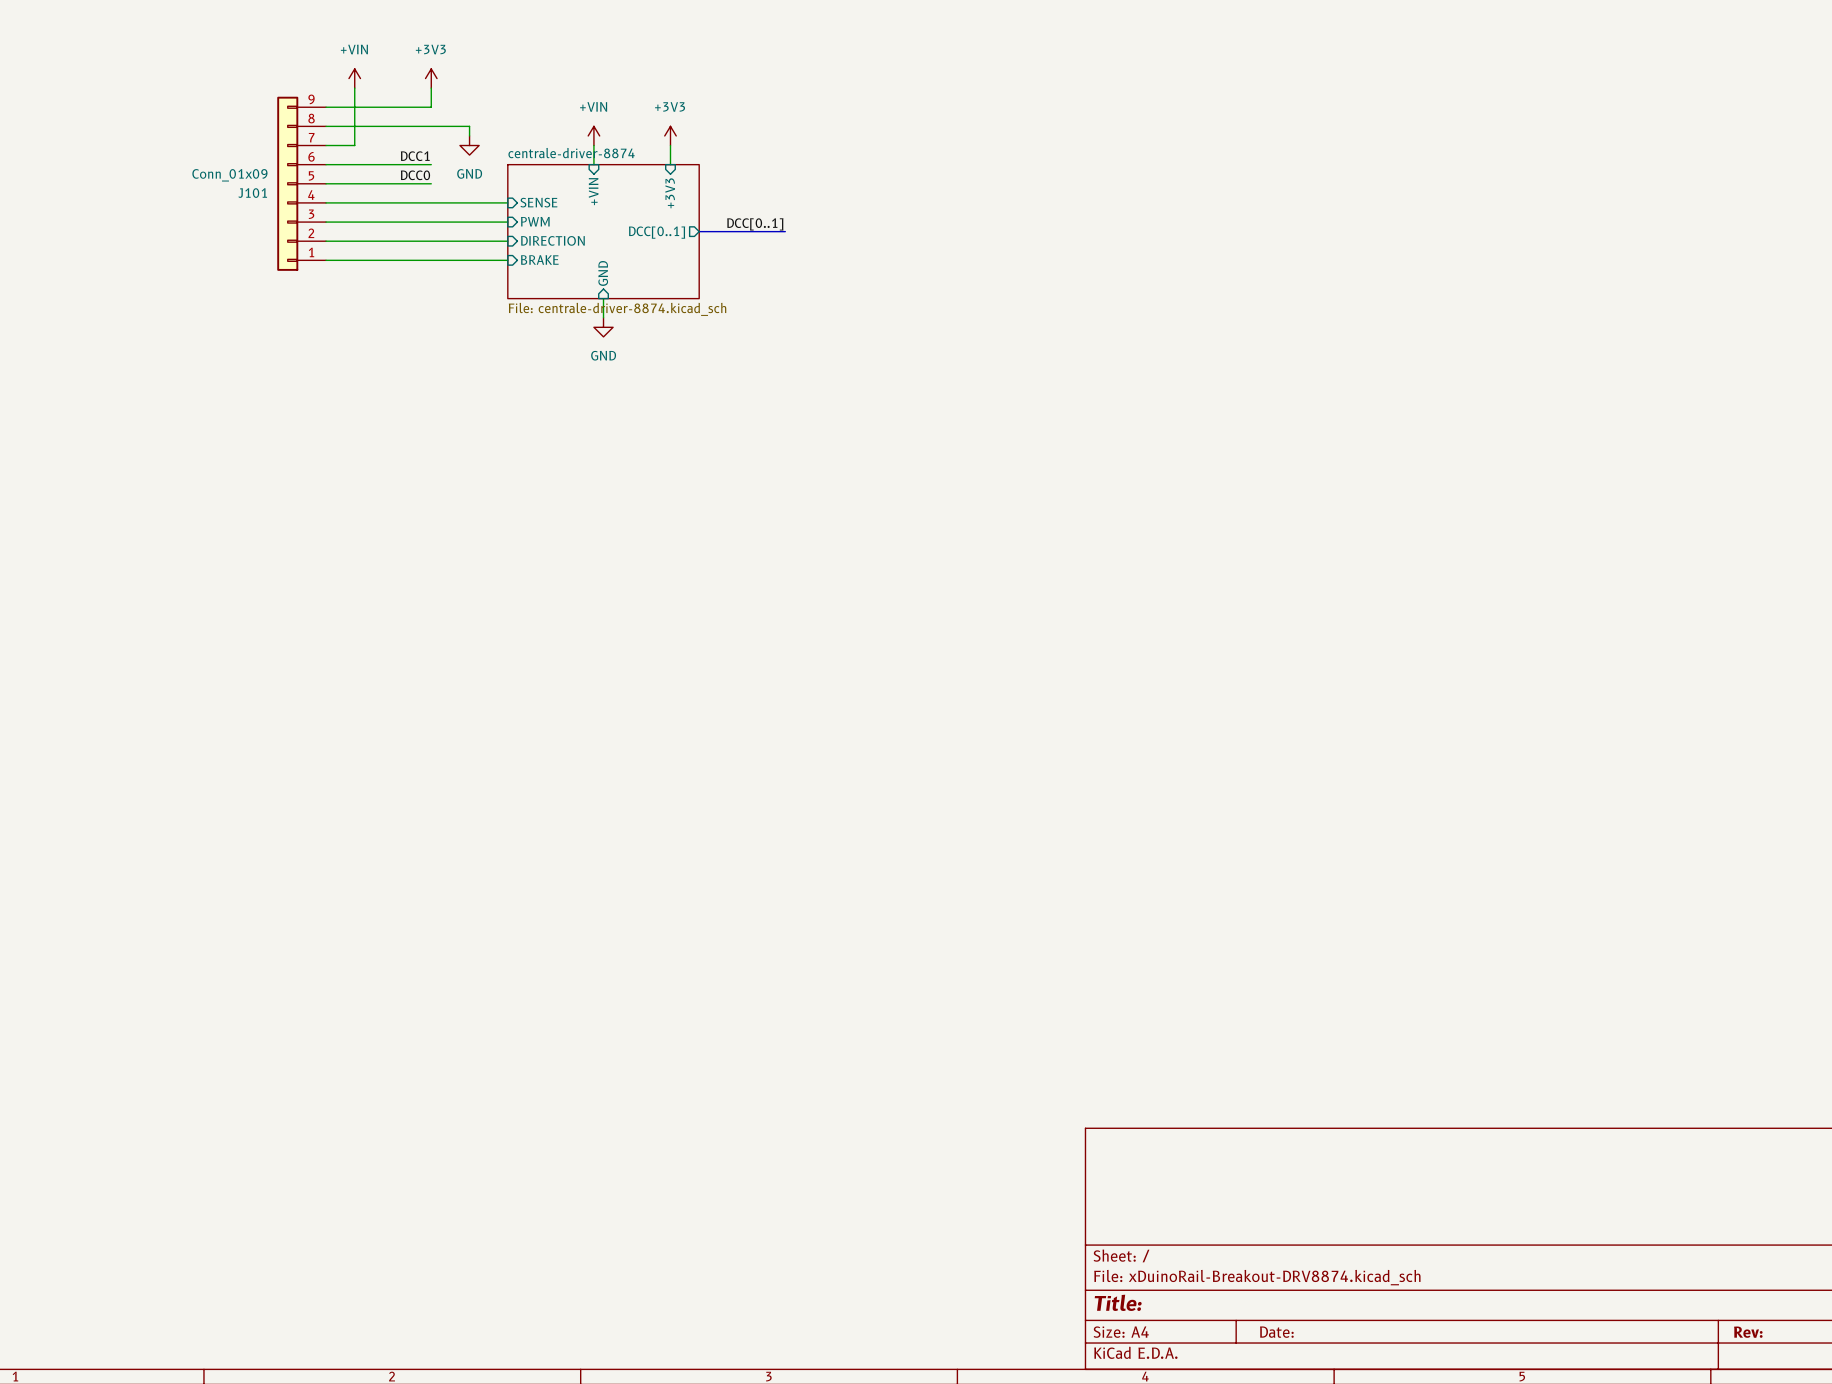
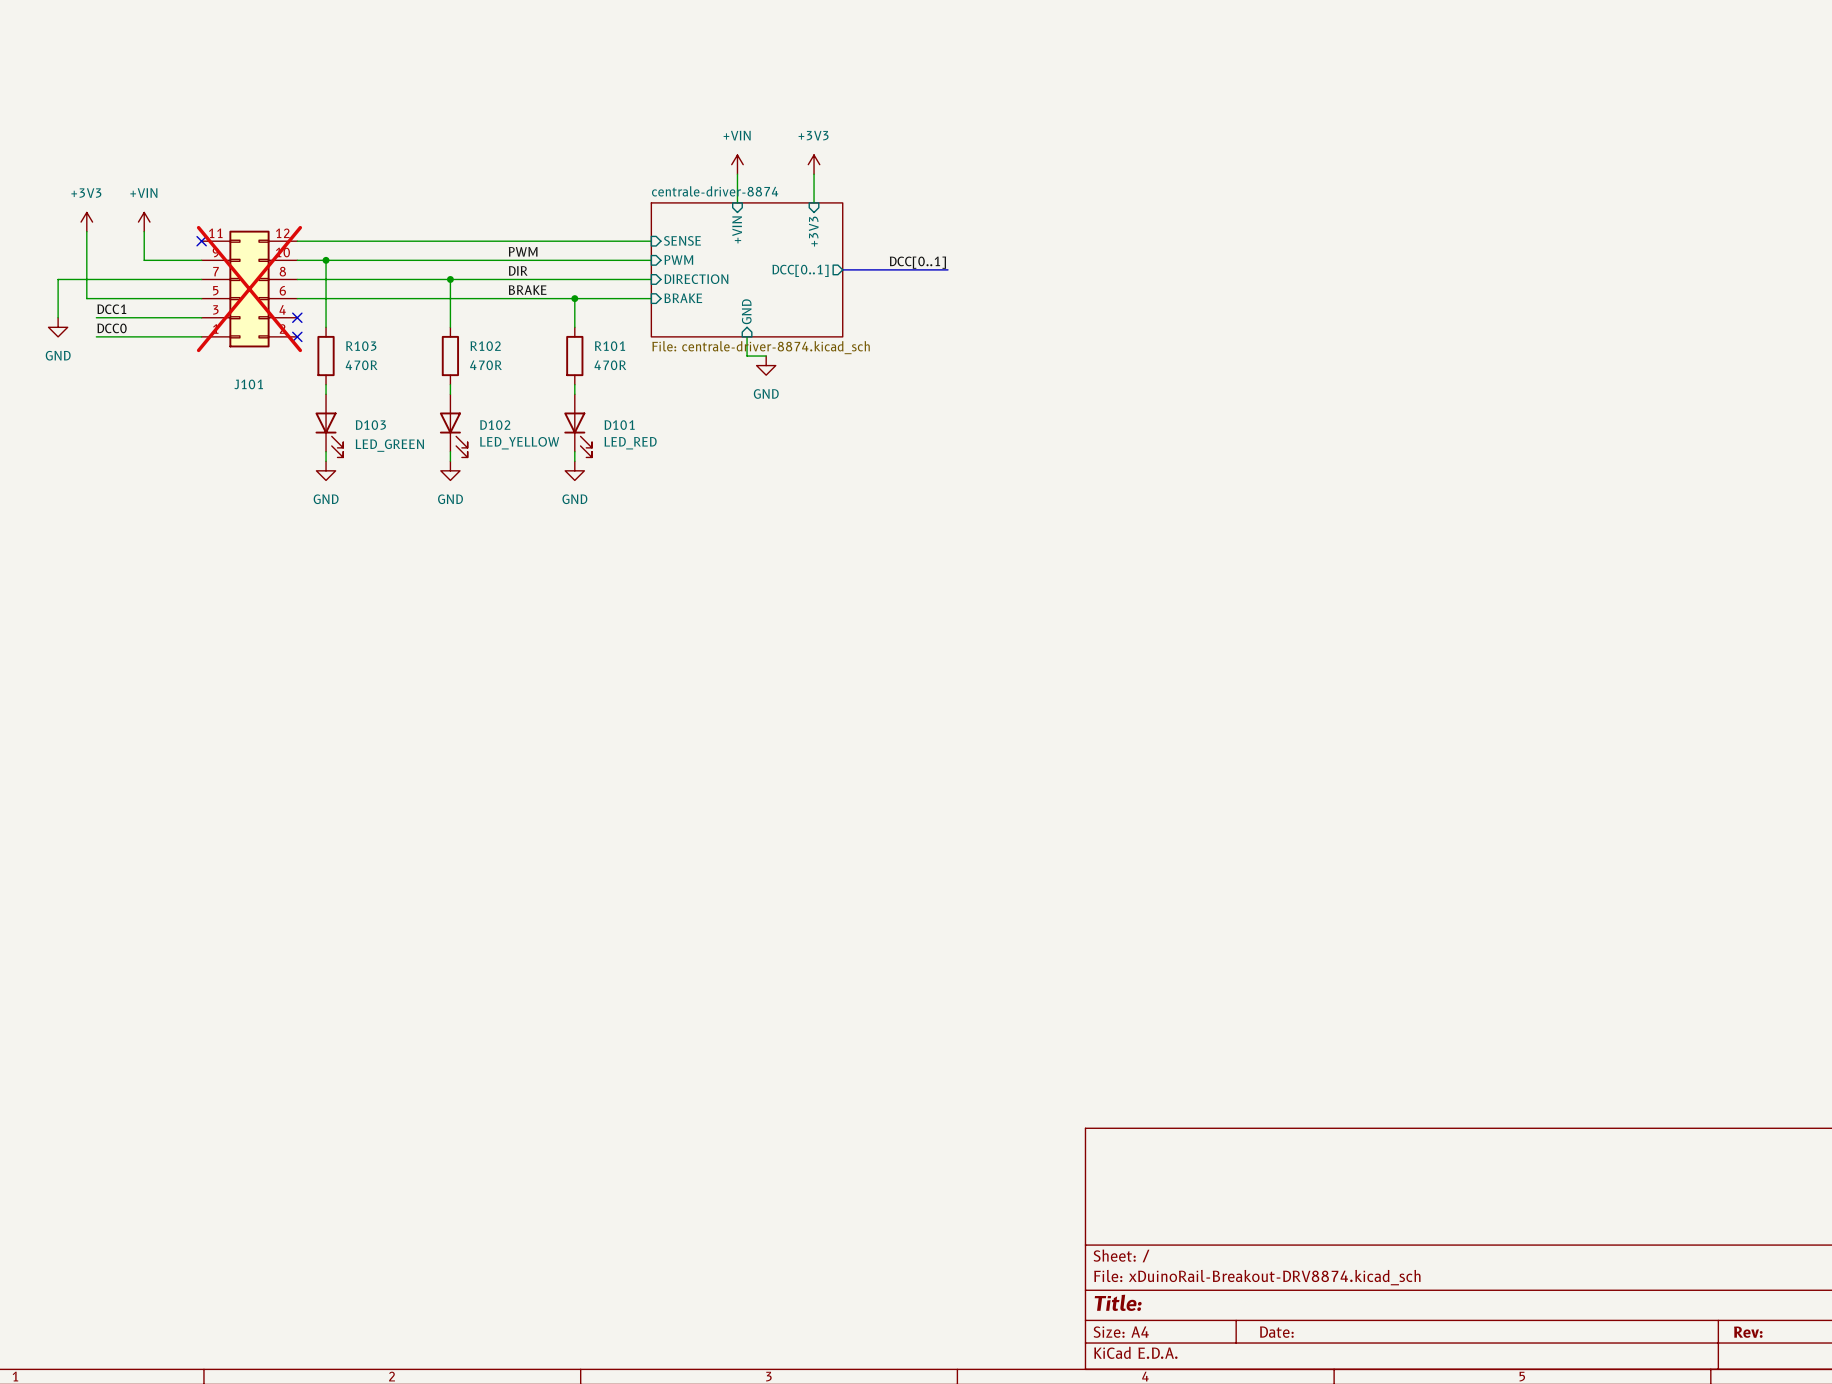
power symbol: +VIN (354, 78) -> none
power symbol: +3V3 (431, 78) -> none
wire: (354, 88) (354, 145) (326, 145) -> none
wire: (431, 88) (431, 107) (326, 107) -> none
J101 symbol: [277, 96, 327, 271] -> [201, 230, 298, 348]
wire: (326, 126) (469, 126) (469, 135) -> none
power symbol position: +VIN (593, 135) -> +VIN (737, 164)
power symbol position: +3V3 (670, 135) -> +3V3 (814, 164)
power symbol: GND (469, 145) -> none
wire: (593, 145) (593, 164) -> none
wire: (670, 145) (670, 164) -> none
label: DCC1 (415, 156) -> none
wire: (326, 164) (431, 164) -> none
wire: none -> (737, 174) (737, 202)
wire: none -> (814, 174) (814, 202)
J101 value: Conn_01x09 (229, 175) -> none
label: DCC0 (415, 175) -> none
wire: (326, 183) (431, 183) -> none
sheet pin position: +VIN (593, 191) -> +VIN (737, 229)
J101 name position: J101 (252, 193) -> J101 (248, 384)
sheet pin position: +3V3 (670, 193) -> +3V3 (813, 231)
wire: (326, 202) (507, 202) -> none
sheet pin position: SENSE (538, 202) -> SENSE (682, 240)
sheet pin position: PWM (535, 221) -> PWM (678, 259)
power symbol: none -> +3V3 (86, 222)
power symbol: none -> +VIN (144, 222)
wire: (326, 222) (507, 222) -> none
label position: DCC[0..1] (755, 224) -> DCC[0..1] (917, 262)
wire: none -> (86, 231) (86, 298) (201, 298)
wire: none -> (144, 231) (144, 260) (201, 260)
sheet centrale-driver-8874 position: (603, 231) -> (747, 269)
bus: (699, 231) (785, 231) -> none
sheet pin position: DCC[0..1] (657, 232) -> DCC[0..1] (800, 270)
sheet pin position: DIRECTION (552, 240) -> DIRECTION (696, 279)
no-connect mark: none -> (201, 241)
wire: none -> (507, 241) (651, 241)
label: none -> PWM (523, 251)
sheet pin position: BRAKE (539, 259) -> BRAKE (683, 298)
wire: none -> (297, 260) (326, 260) (326, 327)
junction: none -> (326, 260)
wire: none -> (507, 260) (651, 260)
bus: none -> (842, 269) (947, 269)
label: none -> DIR (518, 270)
sheet pin position: GND (603, 273) -> GND (746, 311)
wire: none -> (201, 279) (58, 279) (58, 317)
wire: none -> (297, 279) (651, 279)
wire: none -> (450, 279) (450, 327)
junction: none -> (450, 279)
J101 do-not-place cross: none -> (249, 289)
label: none -> BRAKE (527, 290)
wire: none -> (297, 298) (651, 298)
wire: none -> (574, 298) (574, 327)
junction: none -> (574, 298)
wire: (603, 298) (603, 317) -> none
label: none -> DCC1 (111, 309)
wire: none -> (96, 317) (201, 317)
no-connect mark: none -> (297, 317)
power symbol: none -> GND (58, 327)
power symbol: GND (603, 327) -> none
label: none -> DCC0 (112, 328)
wire: none -> (96, 336) (201, 336)
no-connect mark: none -> (297, 336)
wire: none -> (747, 336) (747, 356) (766, 356)
R103: none -> 470R (326, 356)
R102: none -> 470R (450, 356)
R101: none -> 470R (574, 356)
power symbol: none -> GND (766, 365)
wire: none -> (326, 384) (326, 394)
wire: none -> (450, 384) (450, 394)
wire: none -> (574, 384) (574, 394)
D103: none -> LED_GREEN (329, 425)
D102: none -> LED_YELLOW (453, 425)
D101: none -> LED_RED (578, 425)
wire: none -> (326, 451) (326, 461)
wire: none -> (450, 451) (450, 461)
wire: none -> (574, 451) (574, 461)
power symbol: none -> GND (326, 470)
power symbol: none -> GND (450, 470)
power symbol: none -> GND (574, 470)

